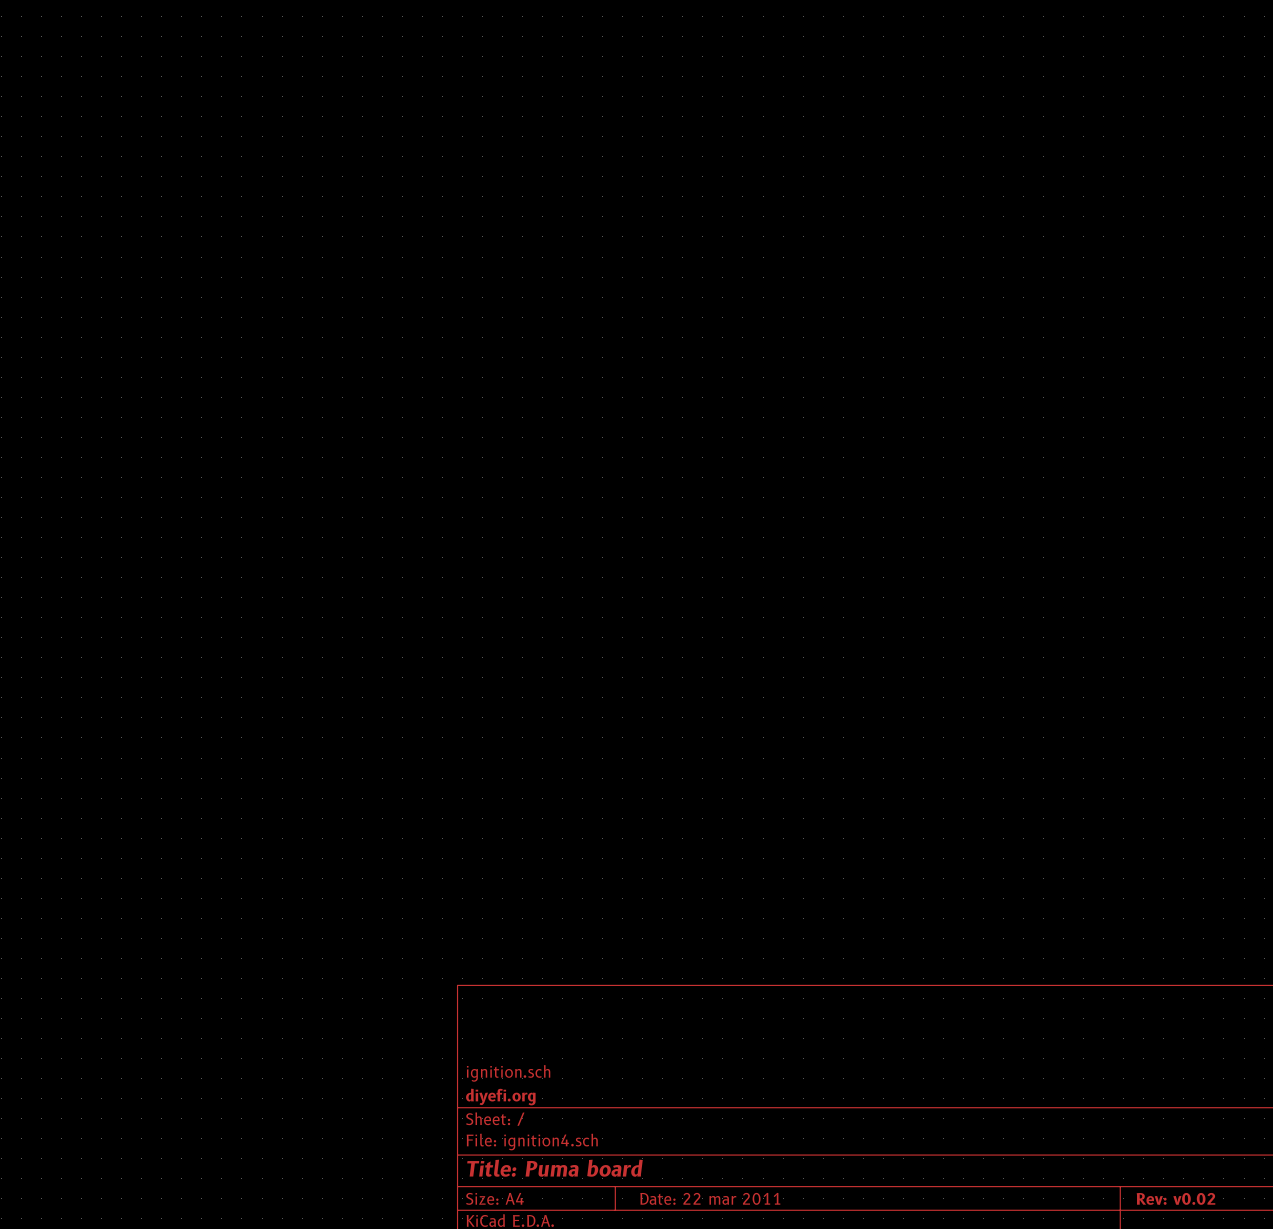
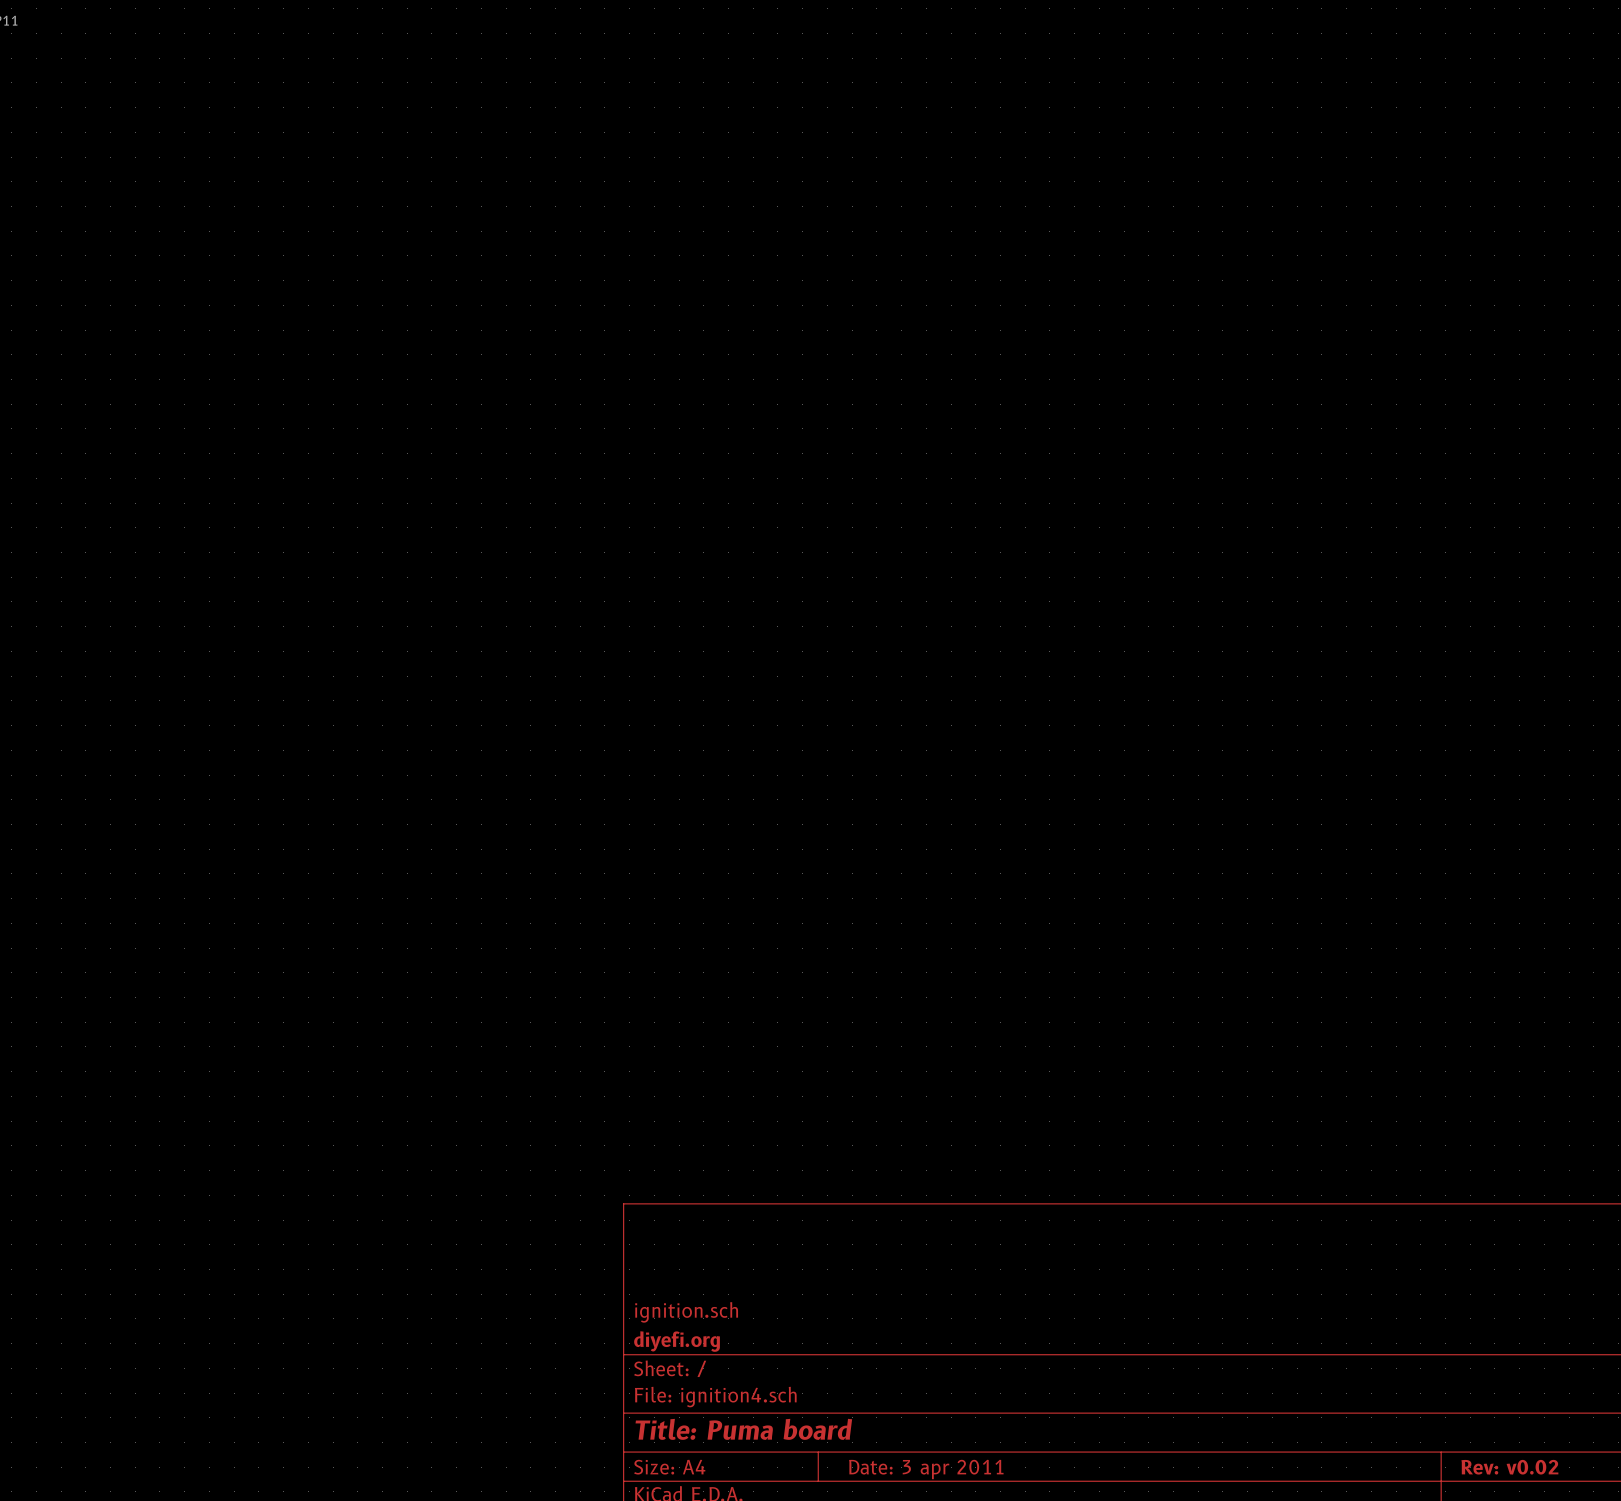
title block: Date: 22 mar 2011 (710, 1198) -> Date: 3 apr 2011 (926, 1469)

